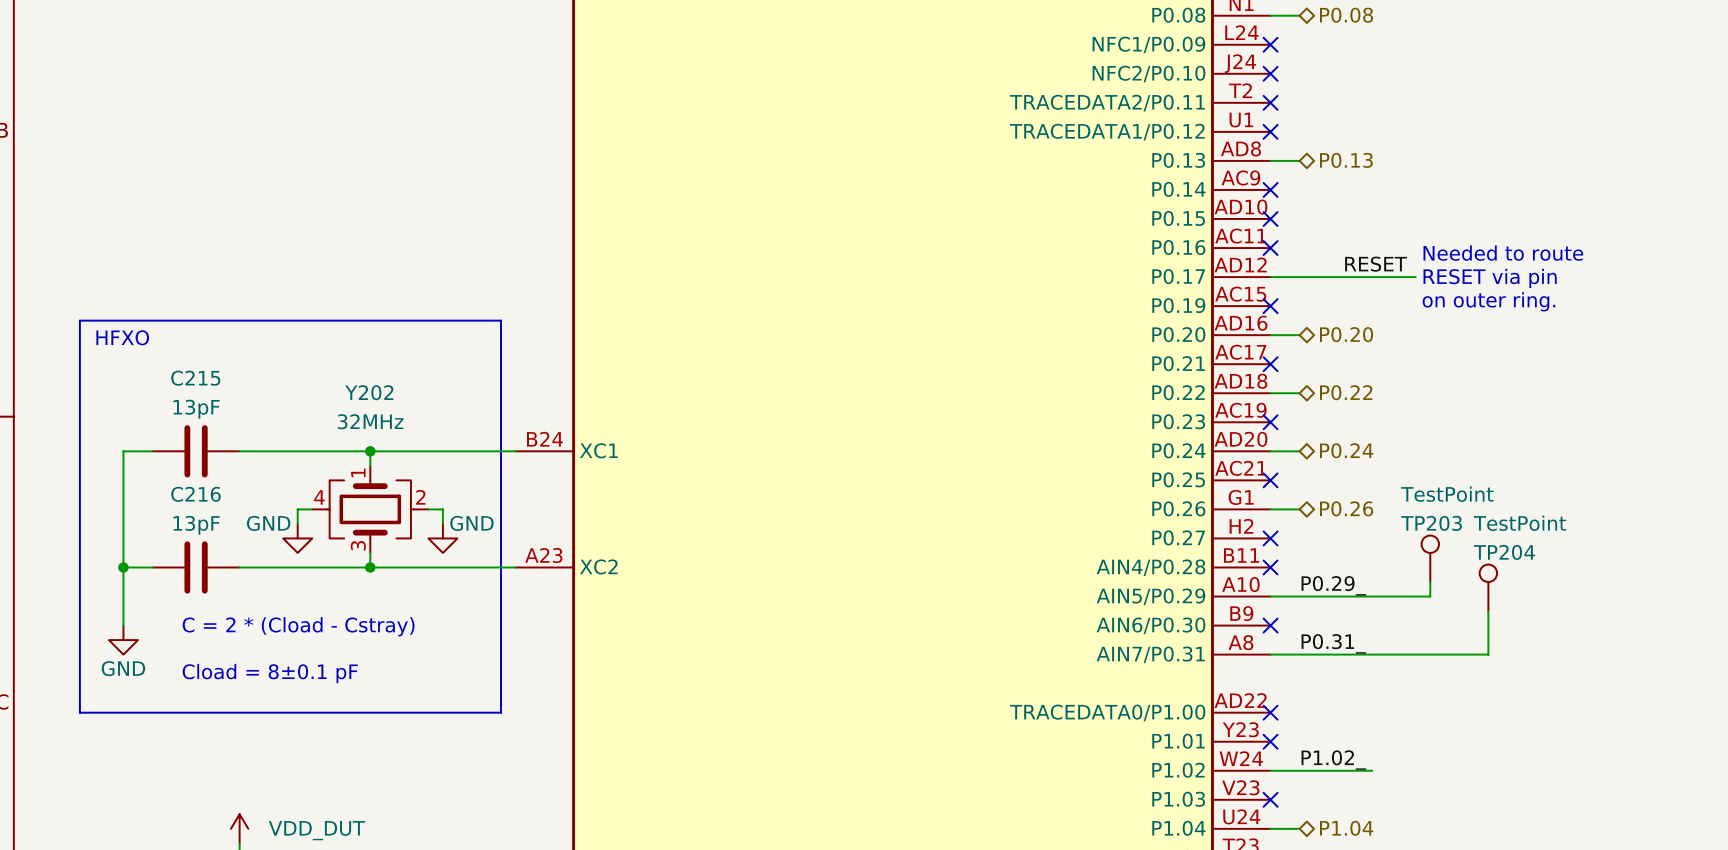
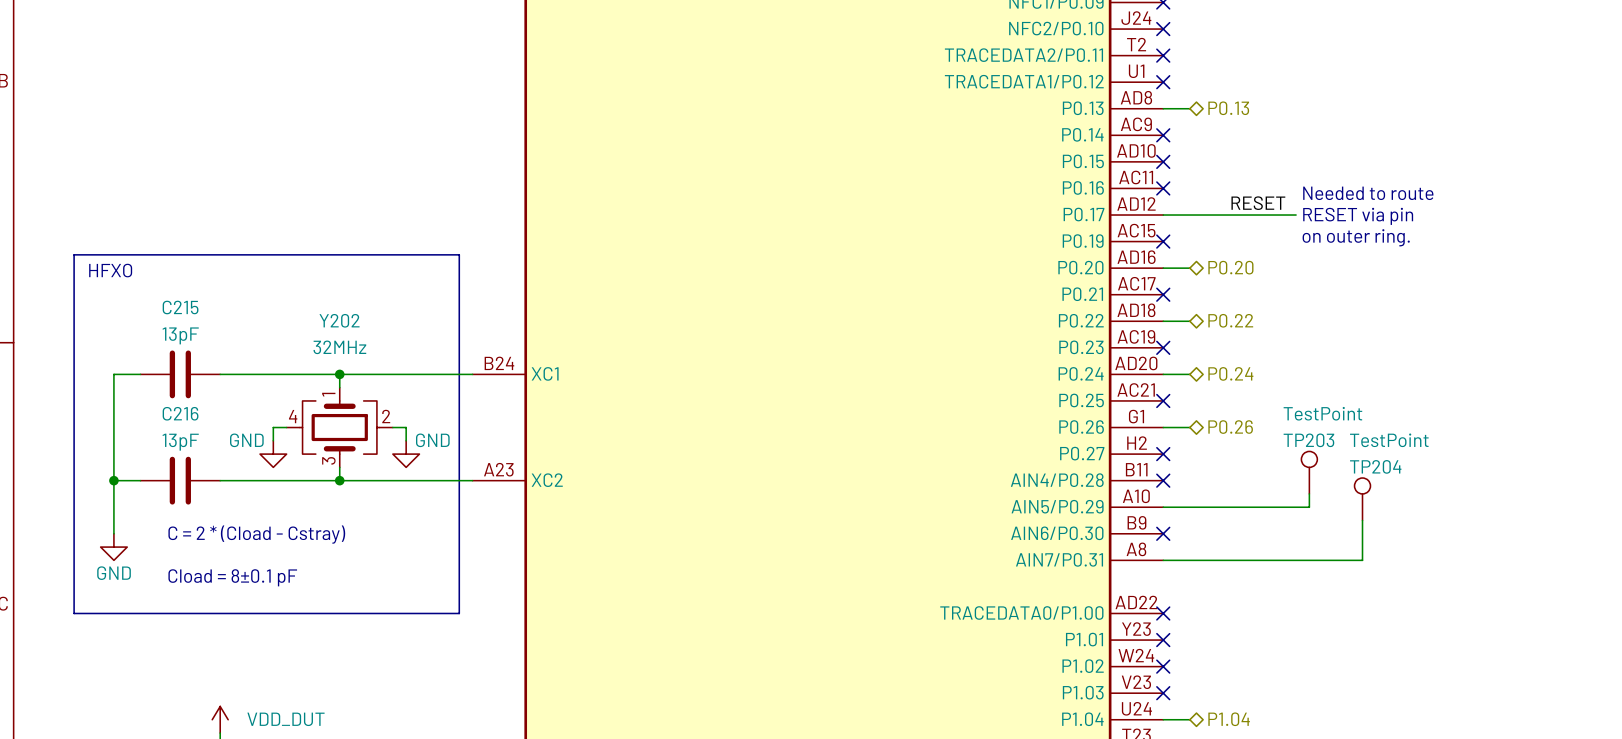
label: P0.29_ (1333, 585) -> none
label: P0.31_ (1333, 643) -> none
label: P1.02_ (1333, 760) -> none
wire: (1270, 770) (1372, 770) -> none
no-connect mark: none -> (1163, 666)

